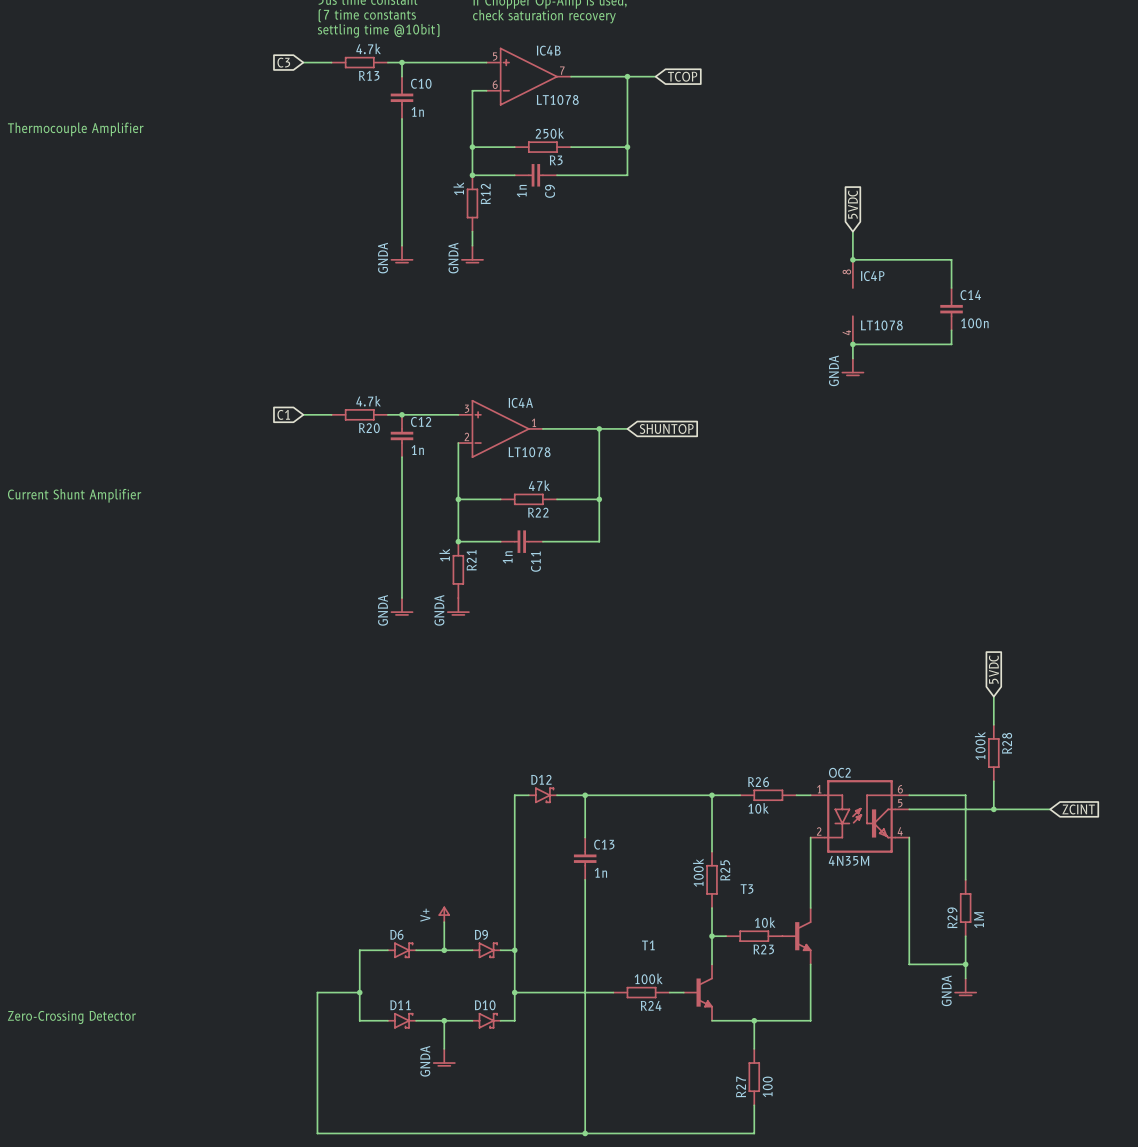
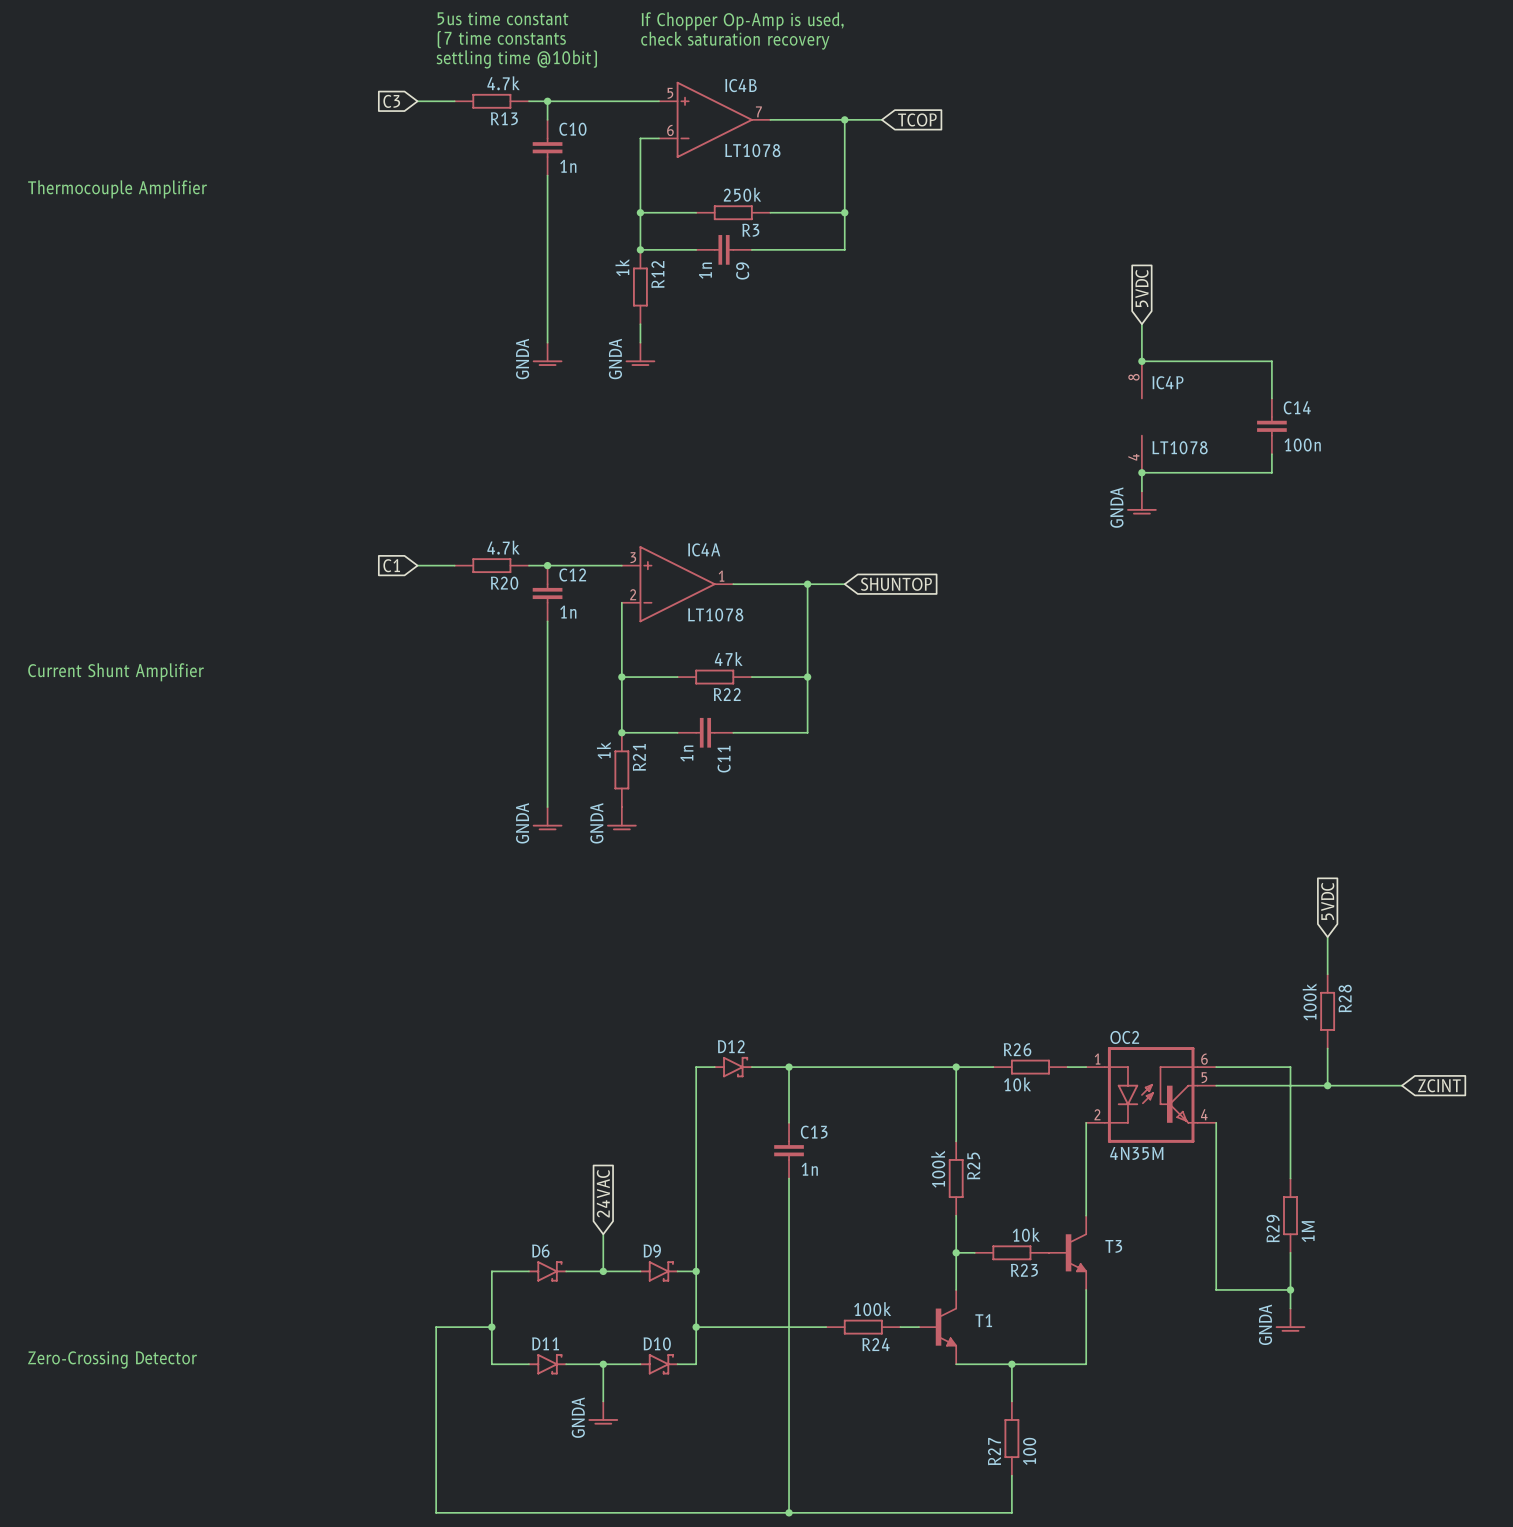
T3 name position: T3 (747, 889) -> T3 (1113, 1246)
global label: none -> 24VAC (603, 1193)
power symbol: V+ (444, 914) -> none
T1 name position: T1 (648, 945) -> T1 (983, 1320)

